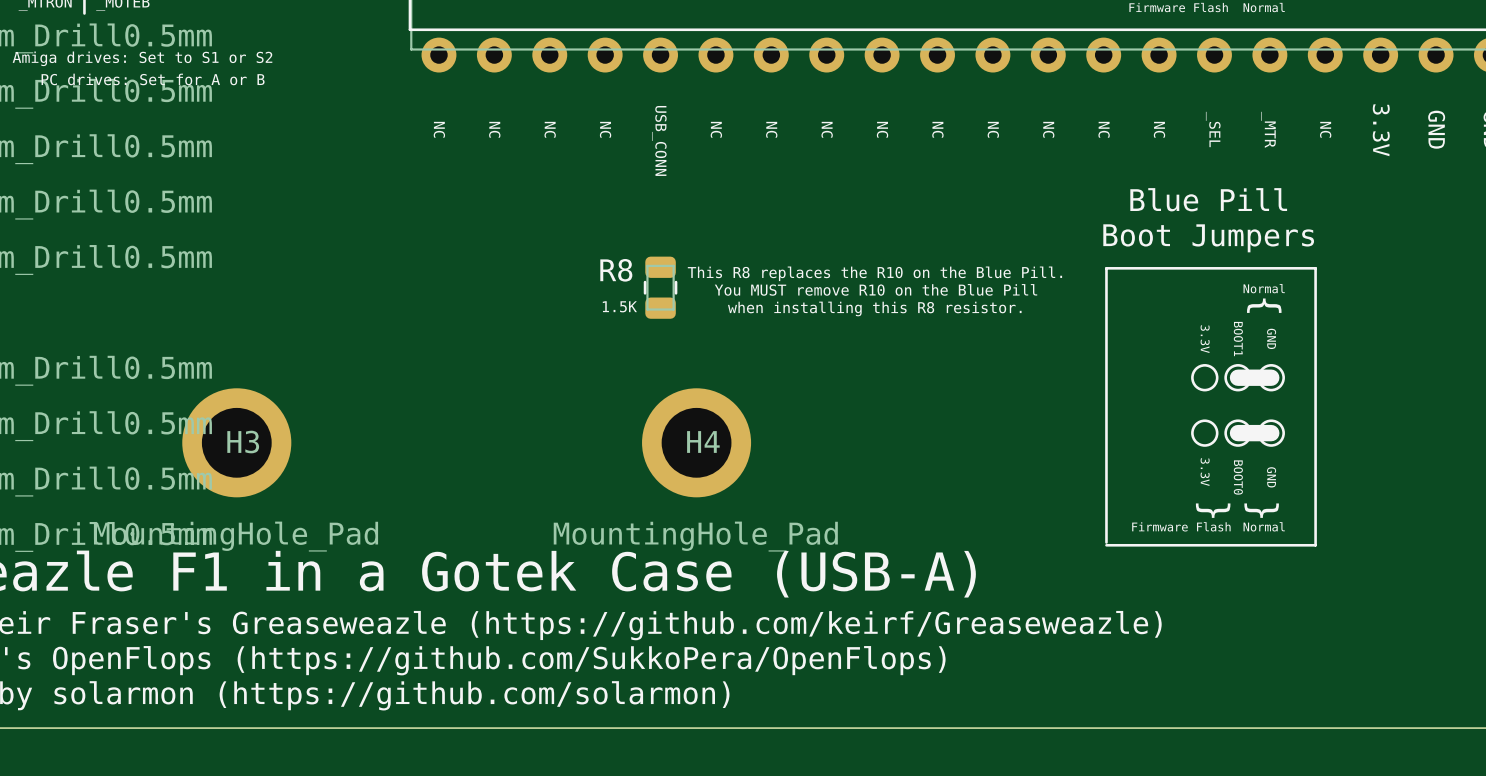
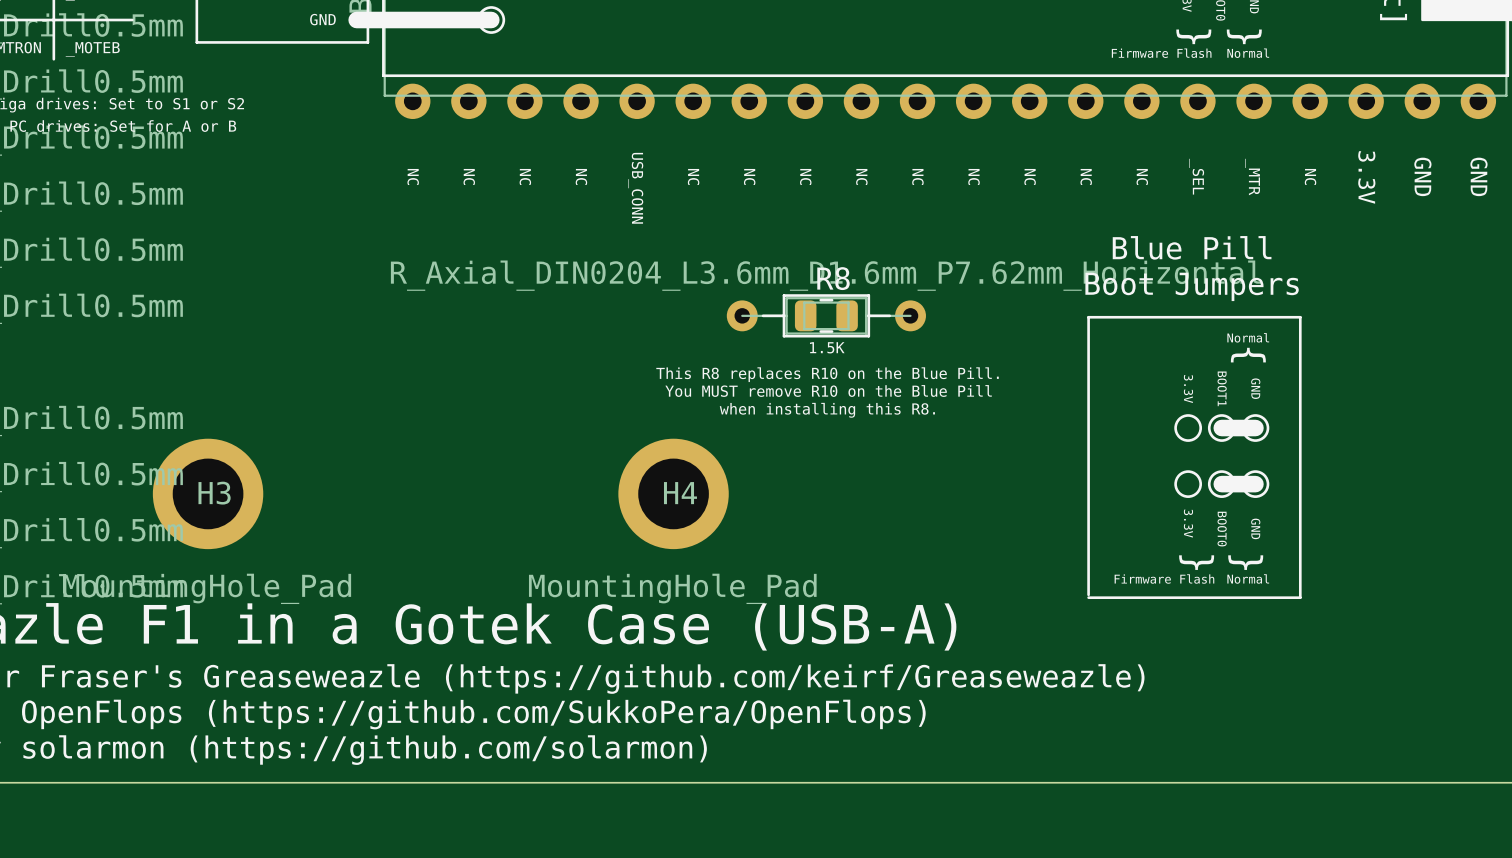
part: none -> R_Axial_DIN0204_L3.6mm_D1.6mm_P7.62mm_Horizontal (826, 315)
text: This R8 replaces the R10 on the Blue Pill. (874, 273) -> none
R8 rotation: 0° (660, 287) -> 90° clockwise (826, 315)
R8 position: (660, 287) -> (826, 315)
text position: You MUST remove R10 on the Blue Pill (875, 289) -> You MUST remove R10 on the Blue Pill (828, 390)
text: when installing this R8 resistor. (874, 308) -> none
text: none -> This R8 replaces R10 on the Blue Pill. (827, 374)
text: none -> when installing this R8. (827, 410)

